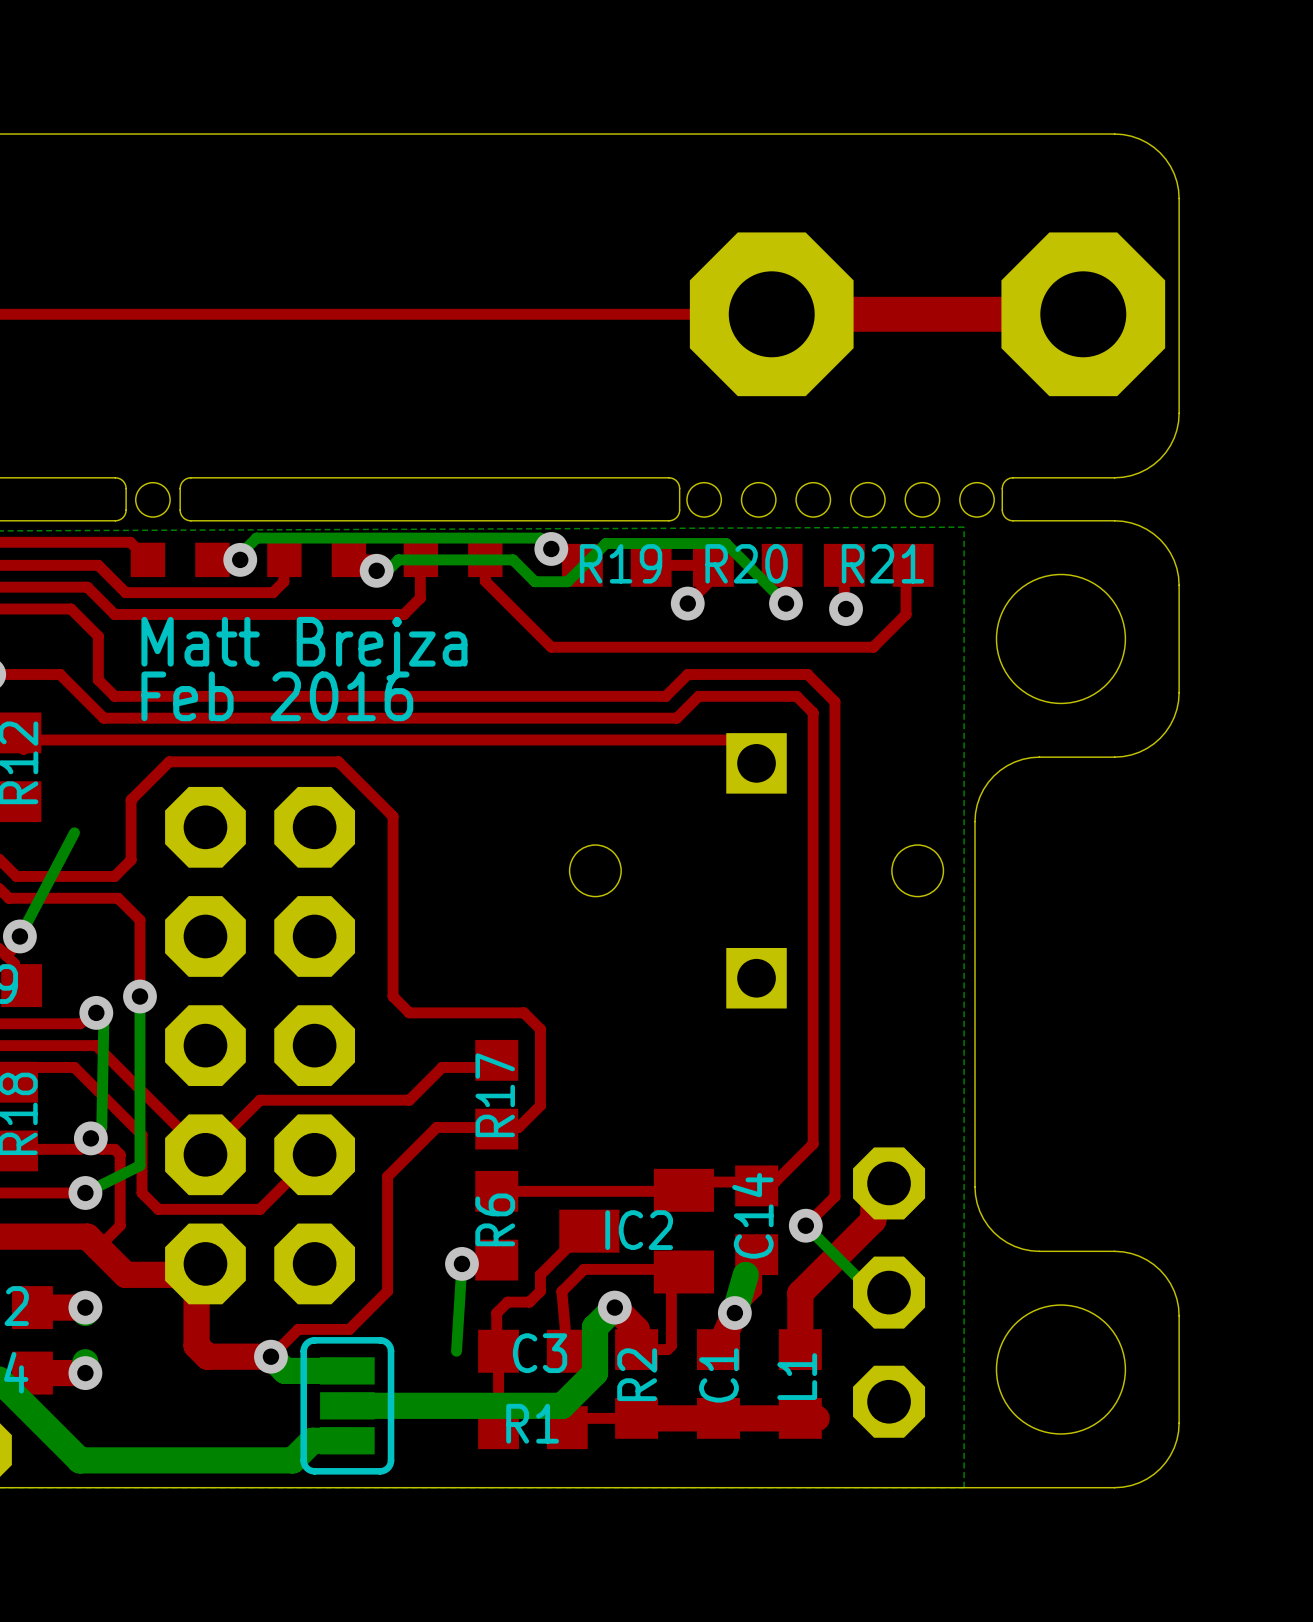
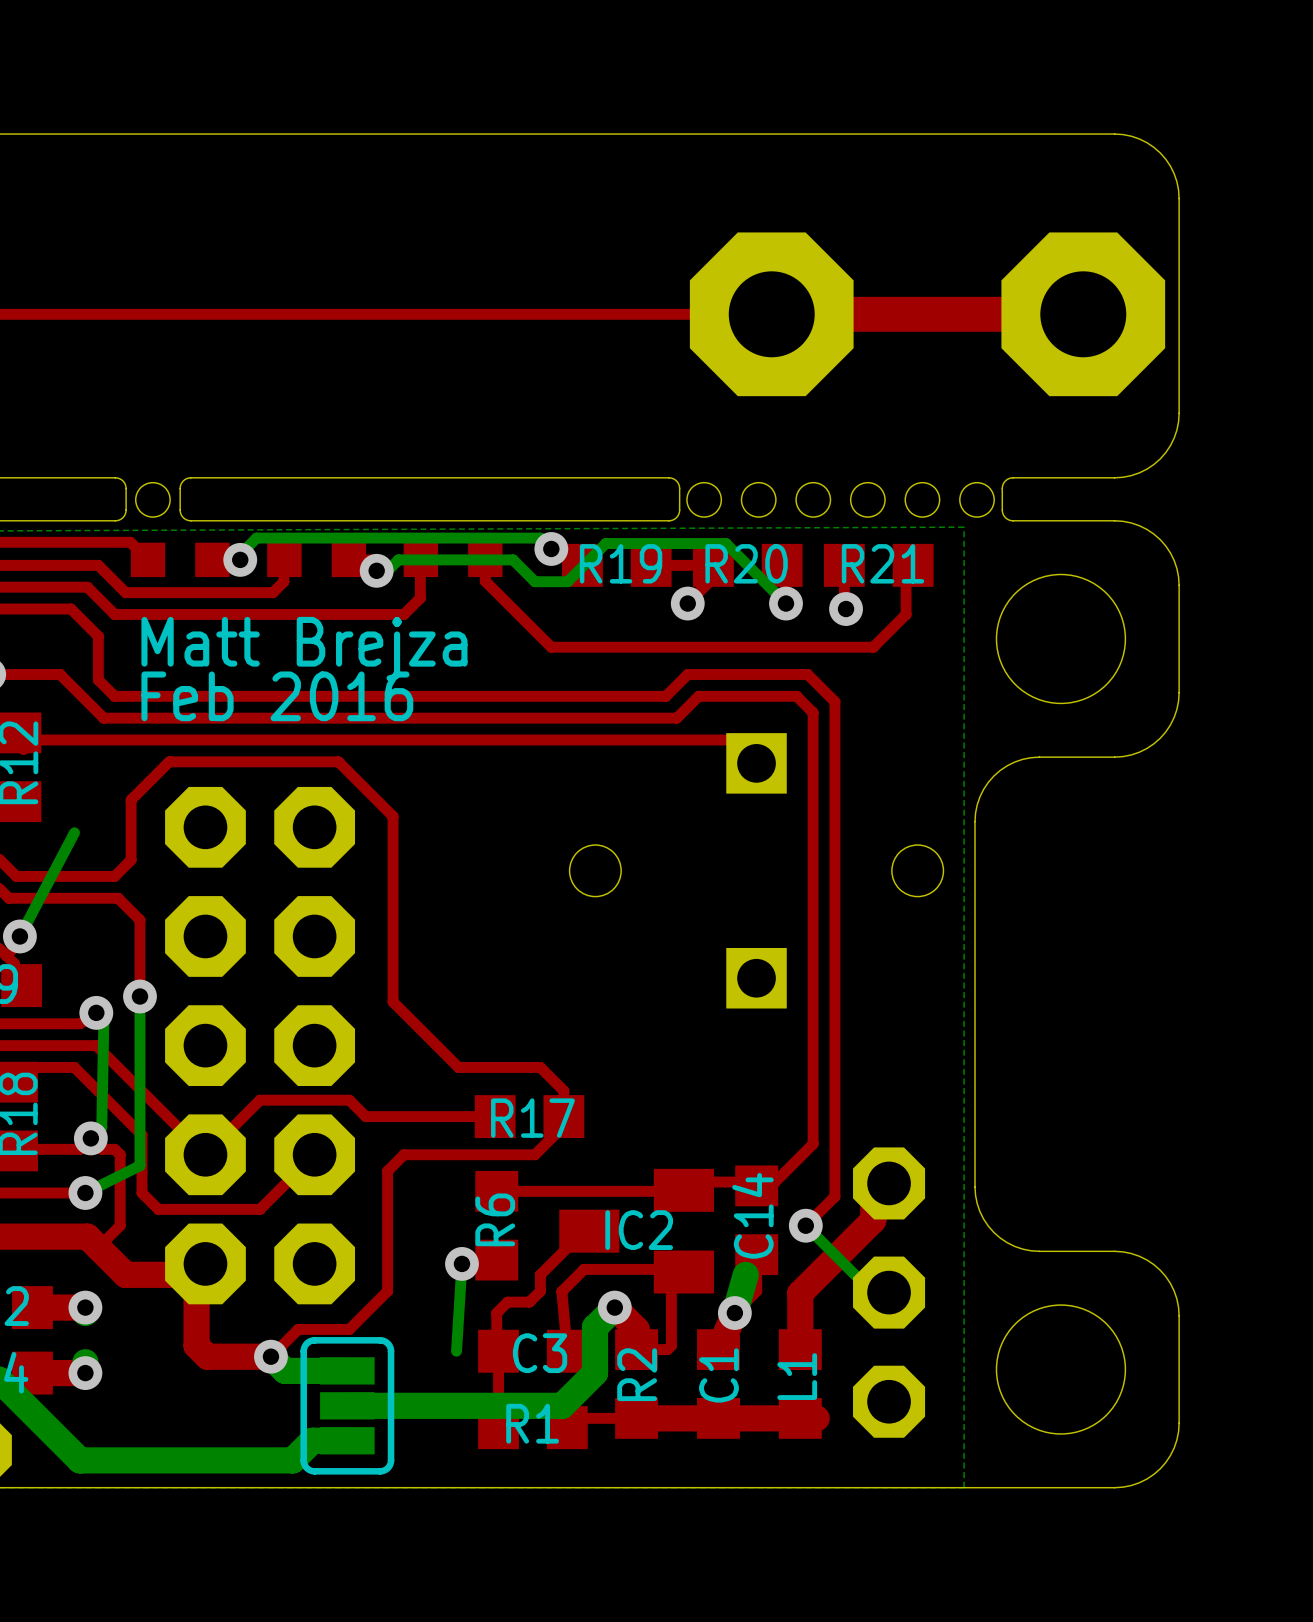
top track: (393, 996) (409, 1012) (524, 1012) (540, 1029) (540, 1105) (518, 1127) (436, 1127) (387, 1176) -> (489, 1067) (540, 1067) (563, 1090) (563, 1125) (534, 1154) (403, 1154) (387, 1171) (387, 1176)
top track: none -> (393, 996) (393, 1001) (458, 1067)
top track: (458, 1067) (442, 1067) (409, 1100) (349, 1100) -> (495, 1116) (365, 1116) (349, 1100)
R17 rotation: 0° (496, 1094) -> 90° clockwise (529, 1116)

